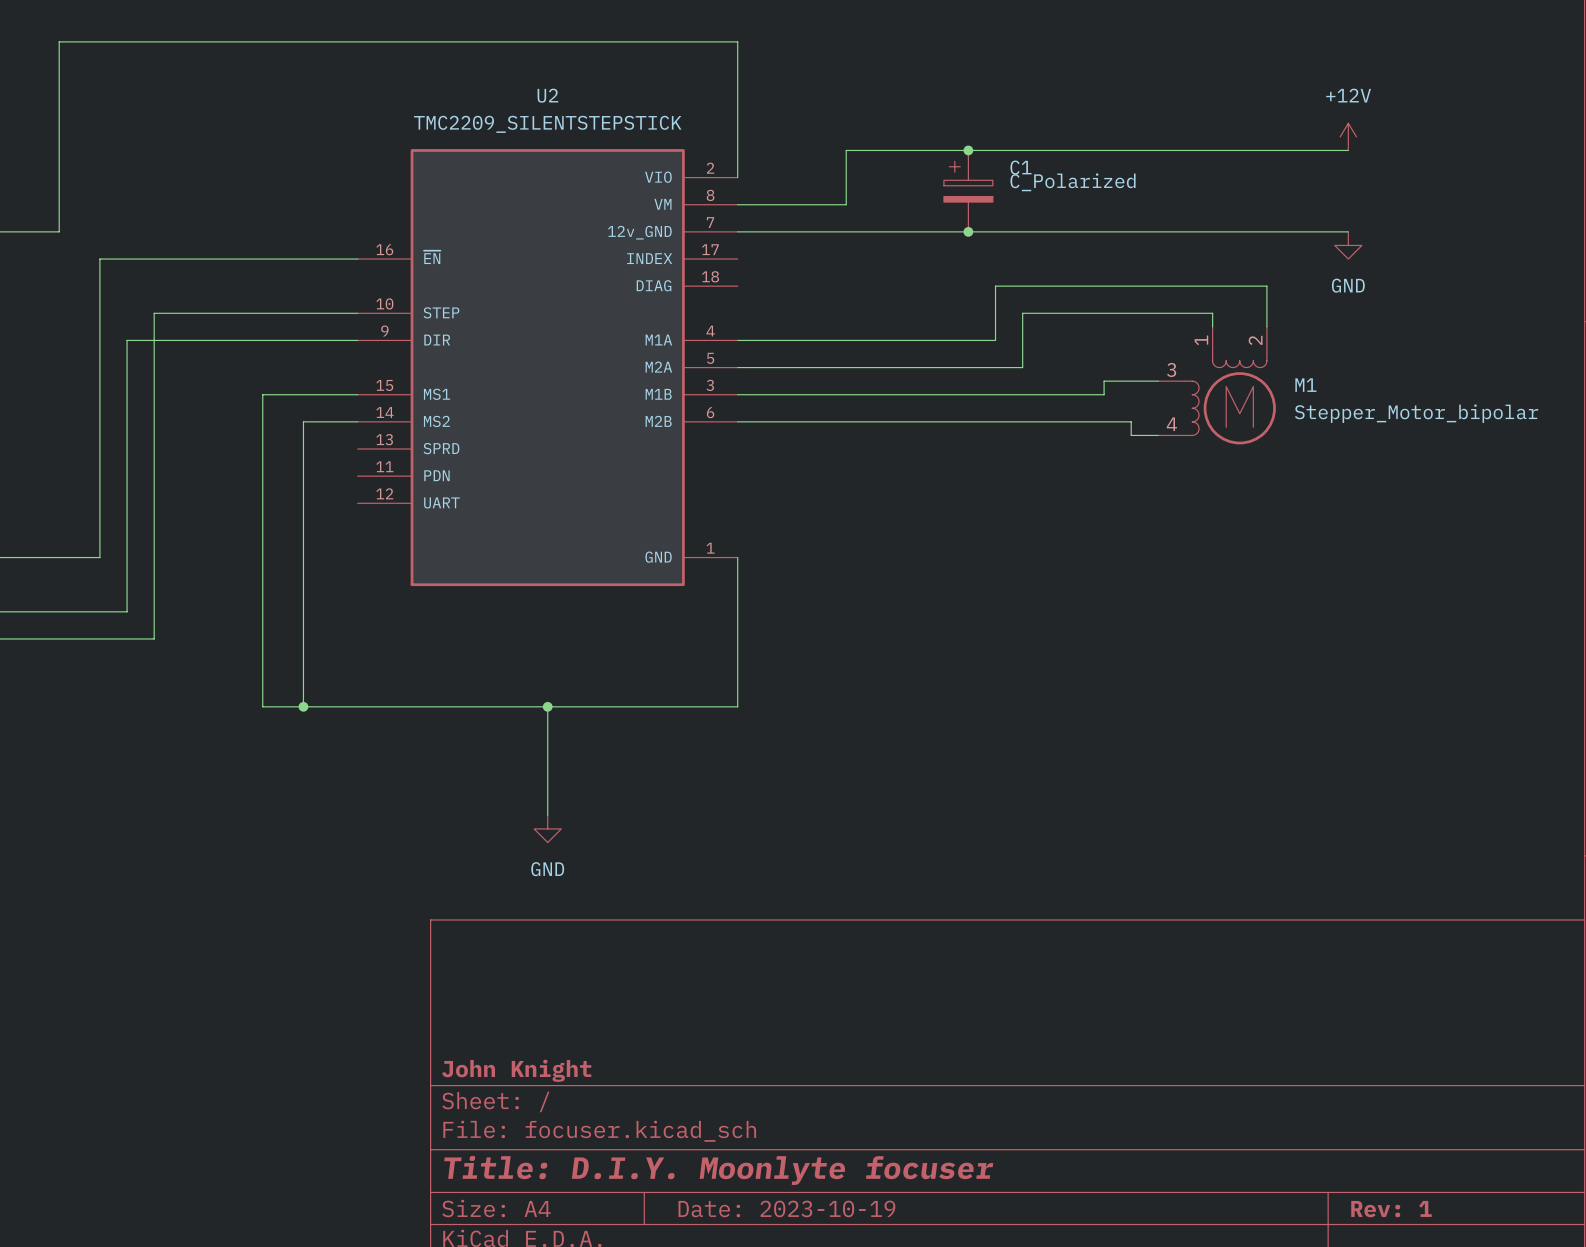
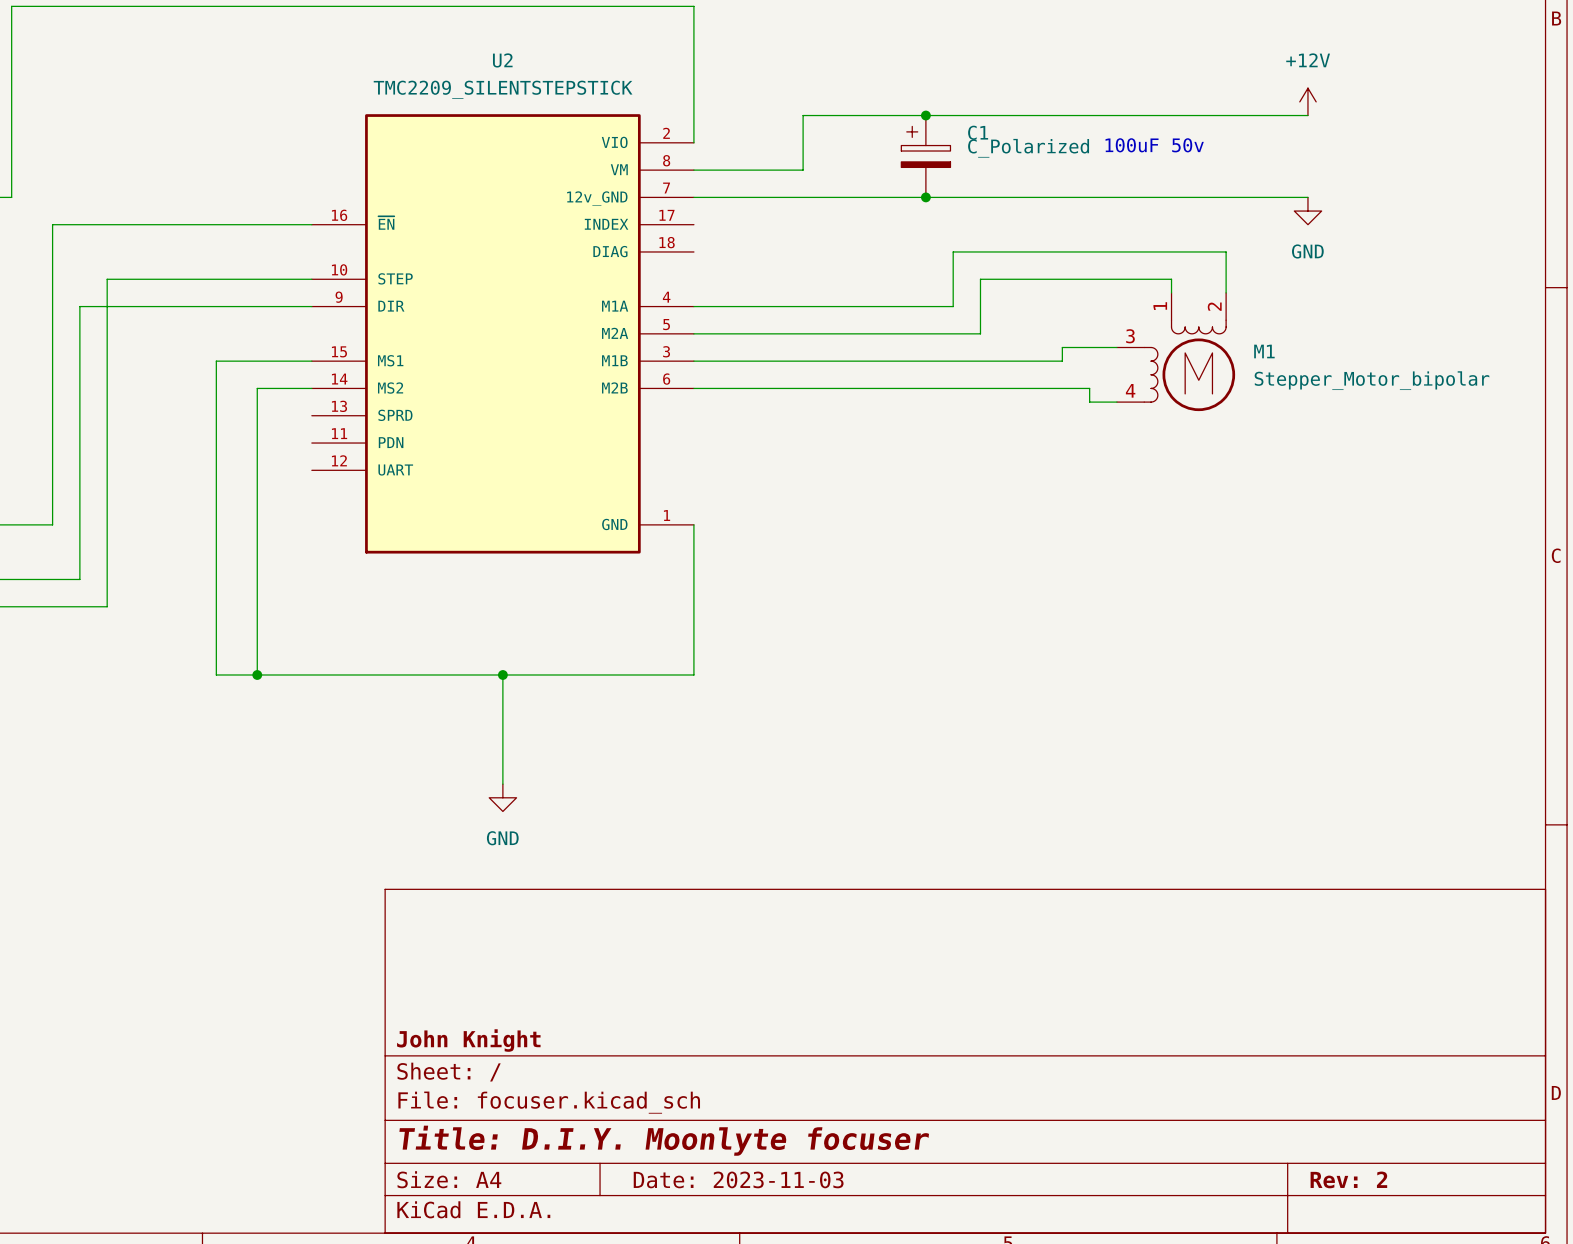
text: none -> 100uF 50v (1154, 145)
title block: Date: 2023-10-19 (786, 1208) -> Date: 2023-11-03 (738, 1179)
title block: Rev: 1 (1391, 1209) -> Rev: 2 (1348, 1179)

